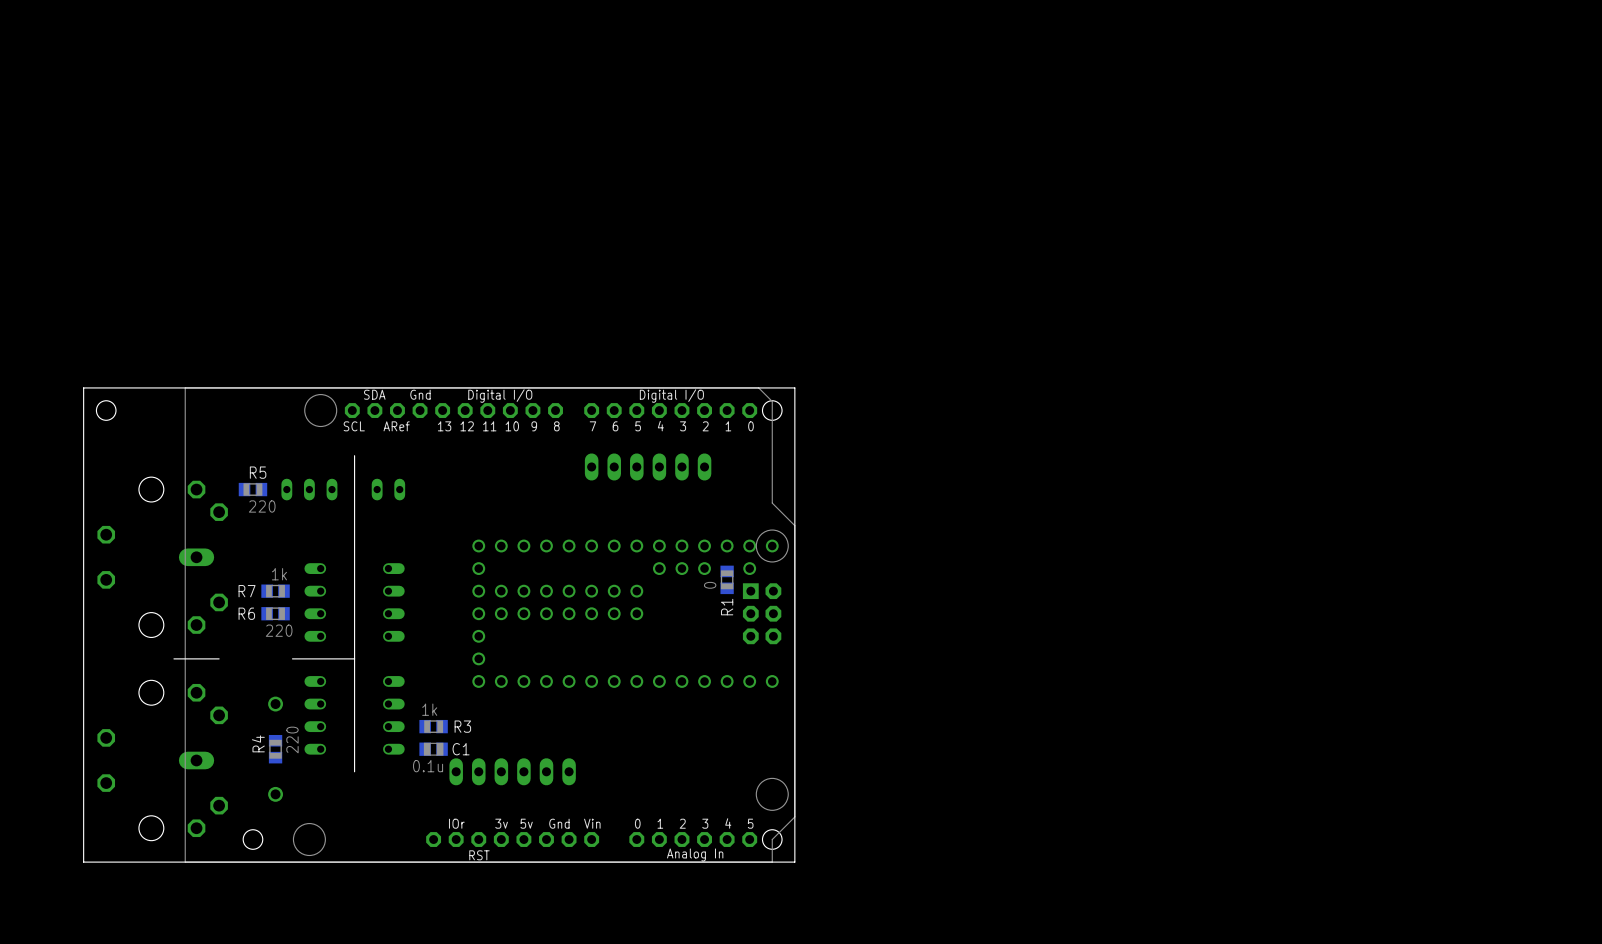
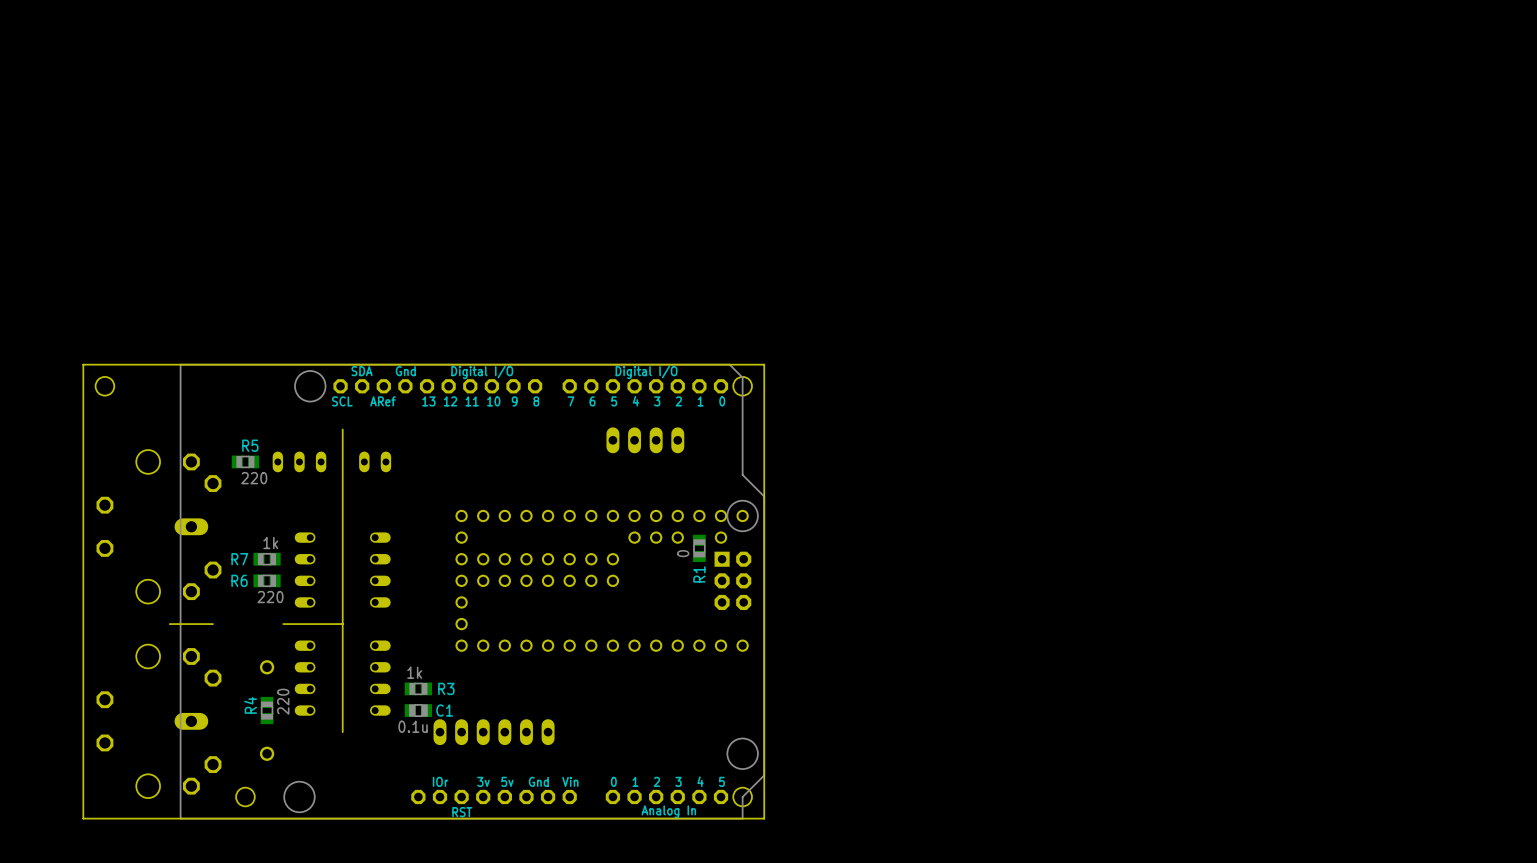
part: (648, 466) -> none

